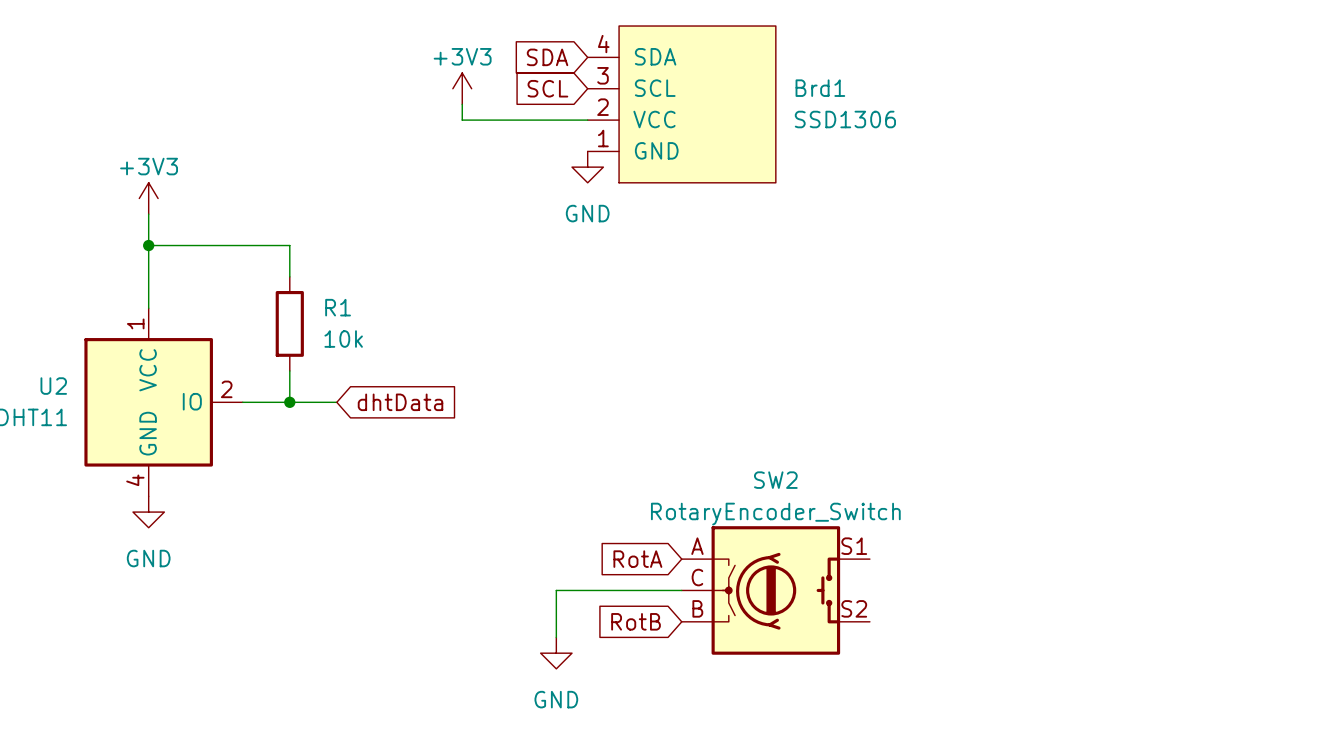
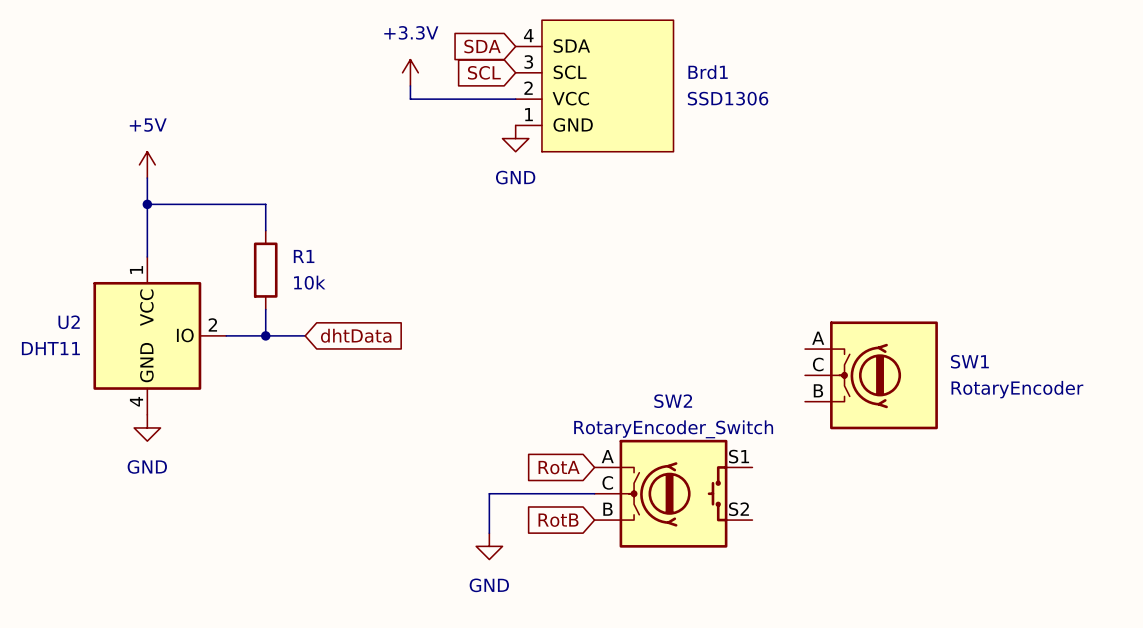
power symbol: +3V3 (462, 88) -> +3.3V (410, 72)
power symbol: +3V3 (148, 198) -> +5V (147, 164)
SW1: none -> RotaryEncoder (871, 375)

